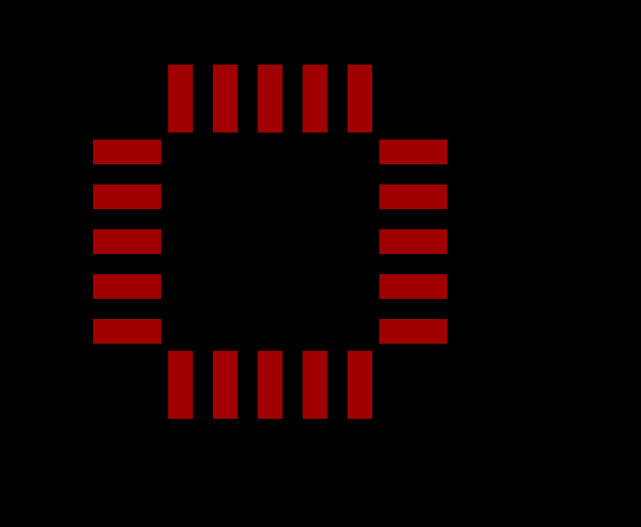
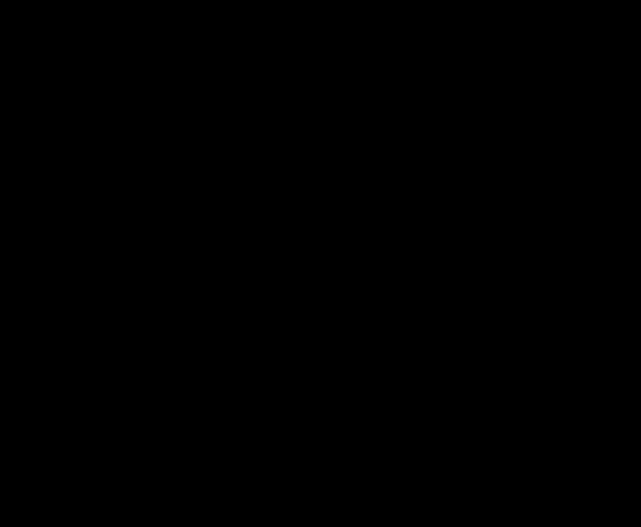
part: (270, 241) -> none

